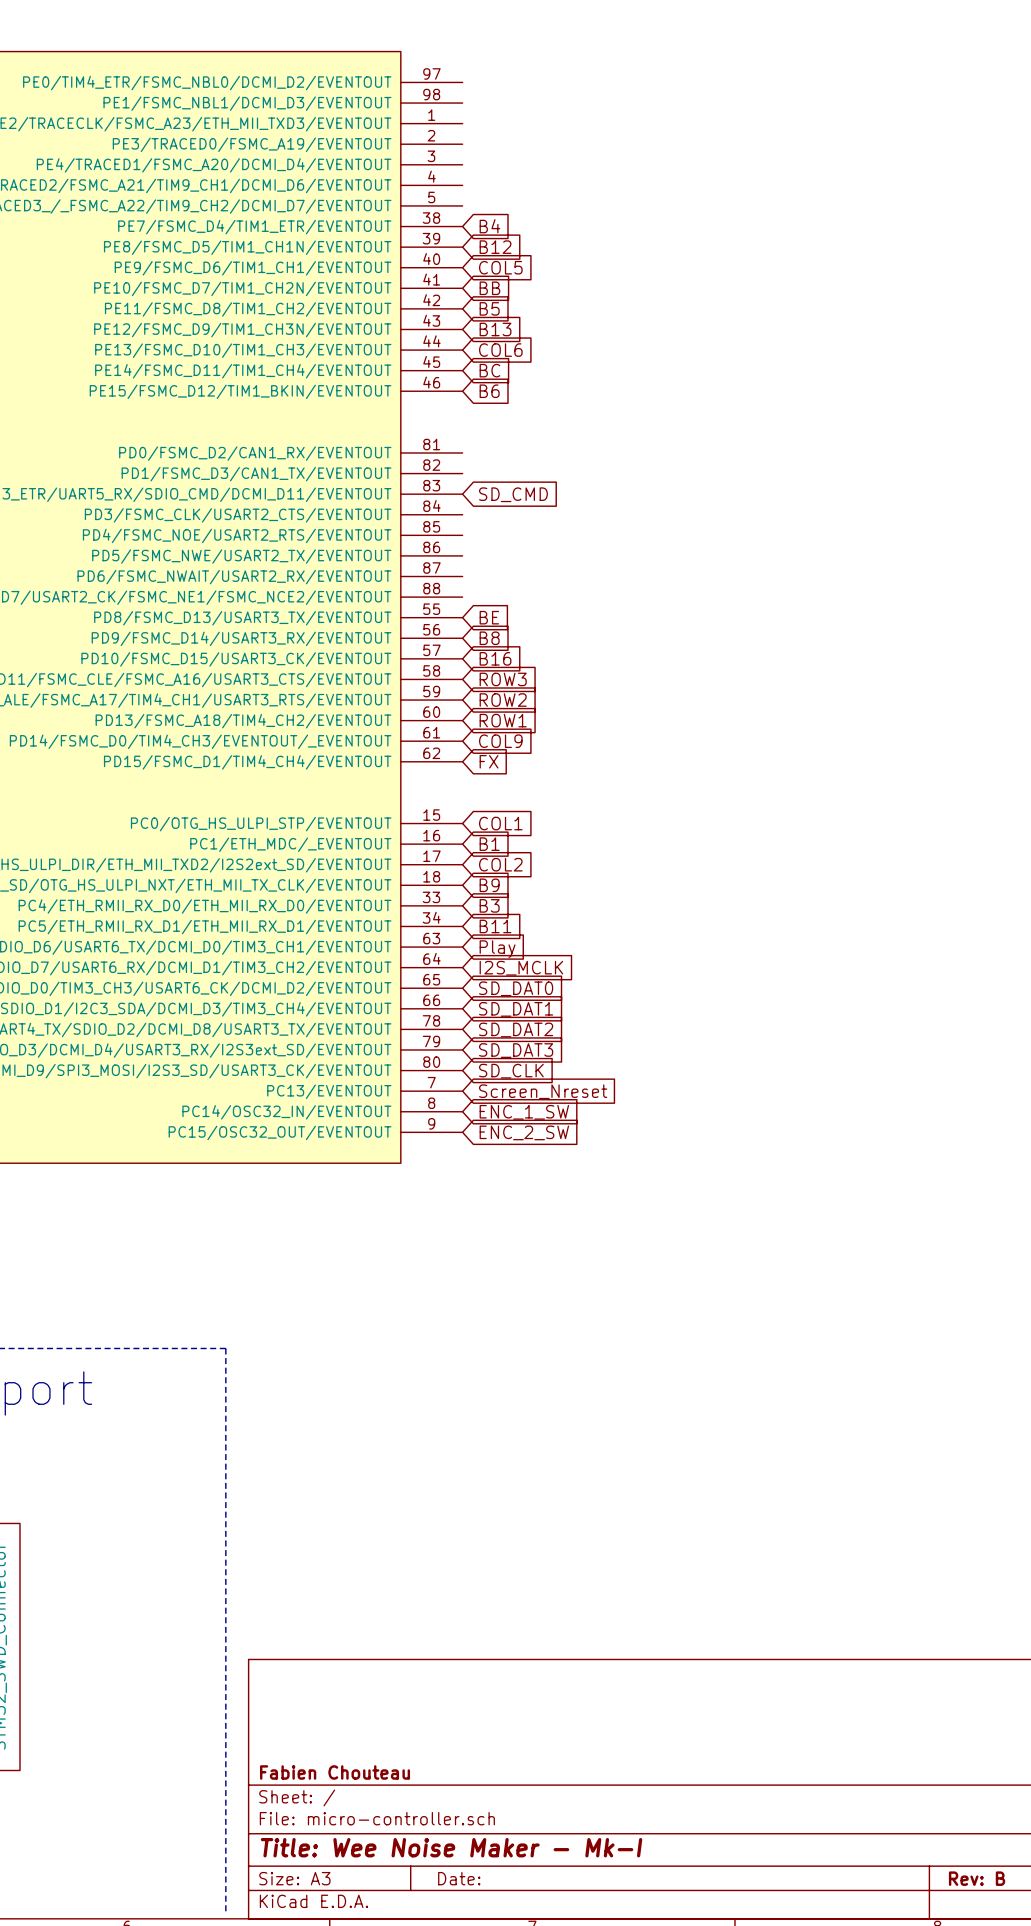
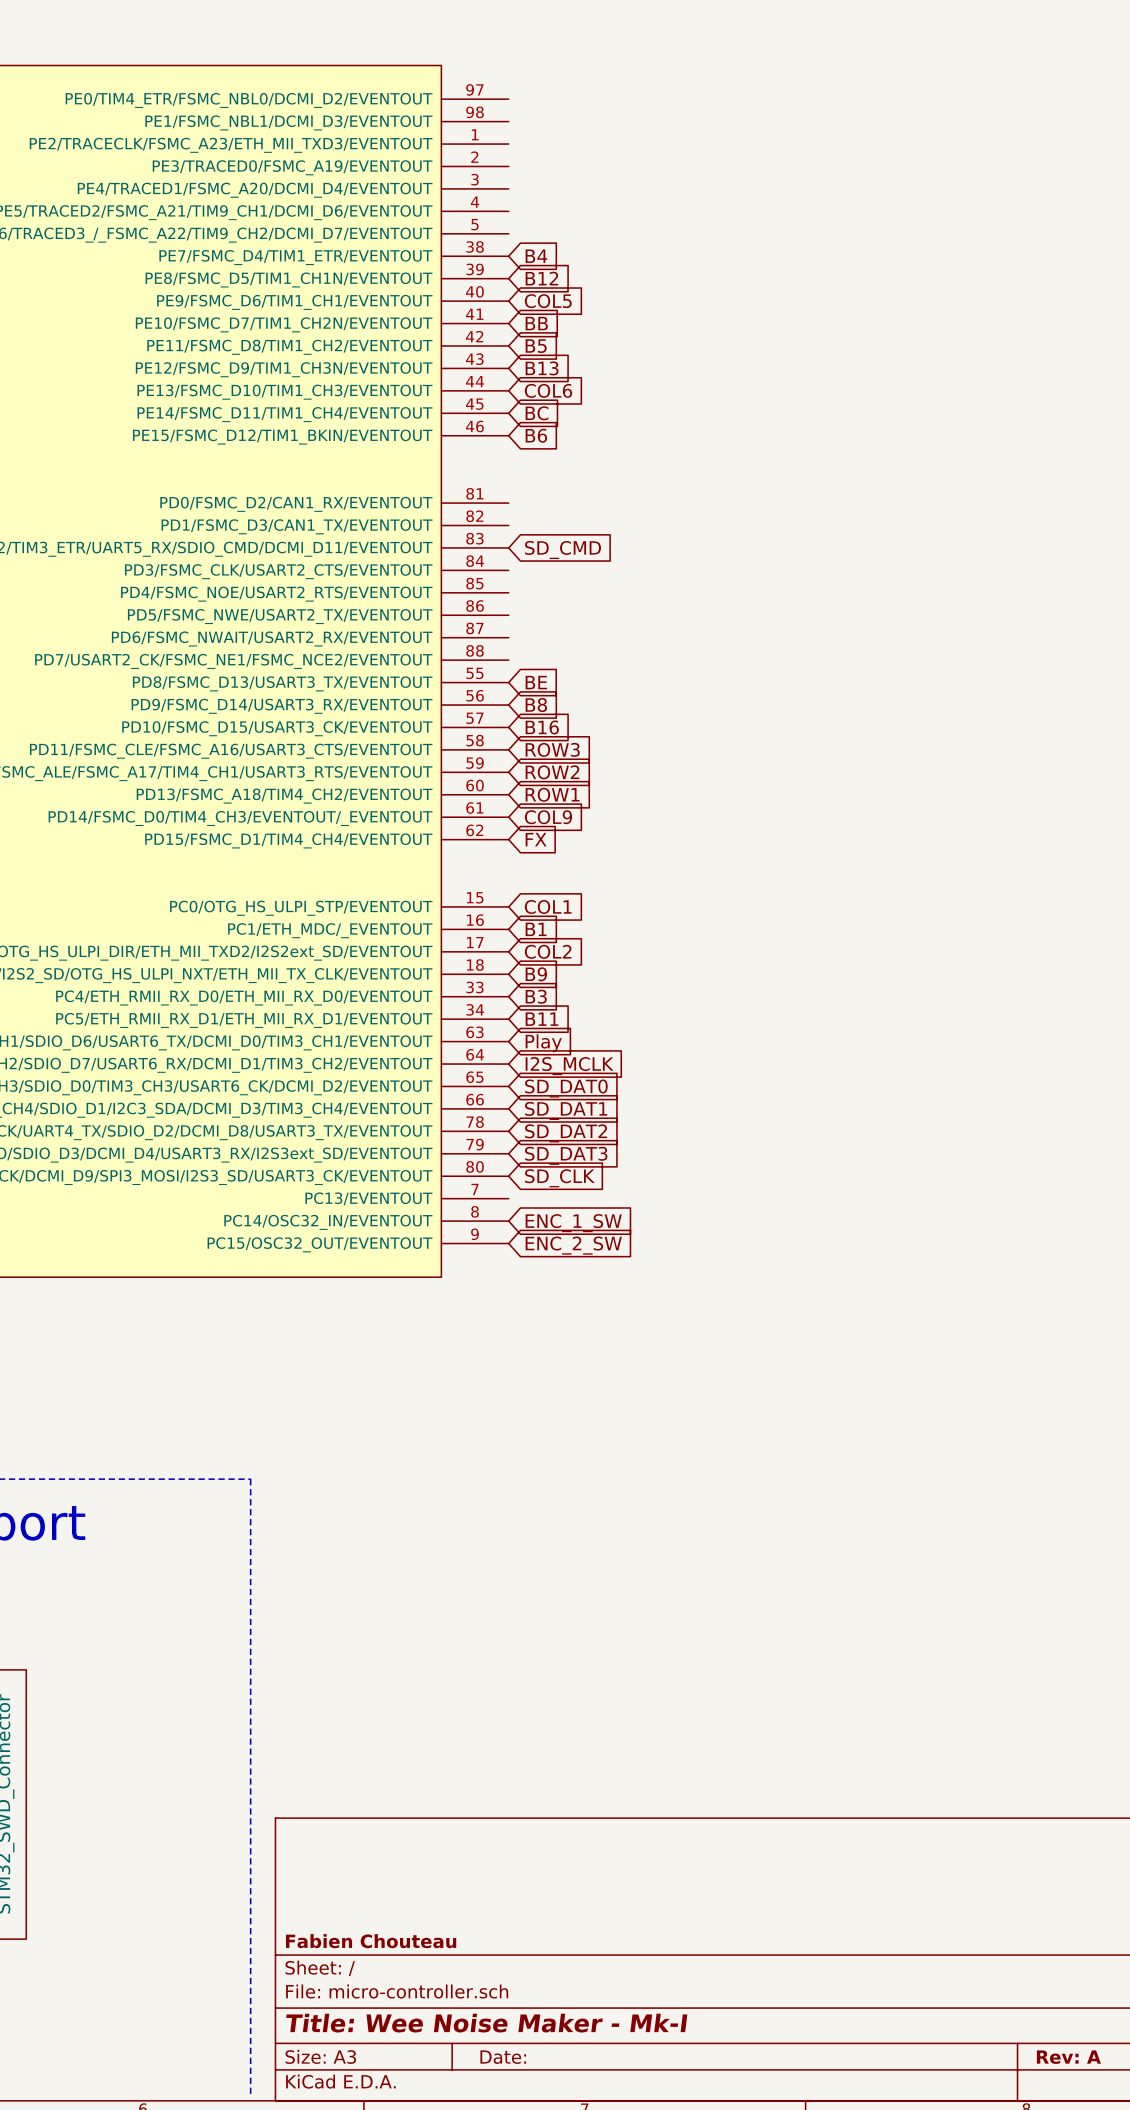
global label: Screen_Nreset (543, 1091) -> none
title block: Rev: B (977, 1878) -> Rev: A (1068, 2057)

